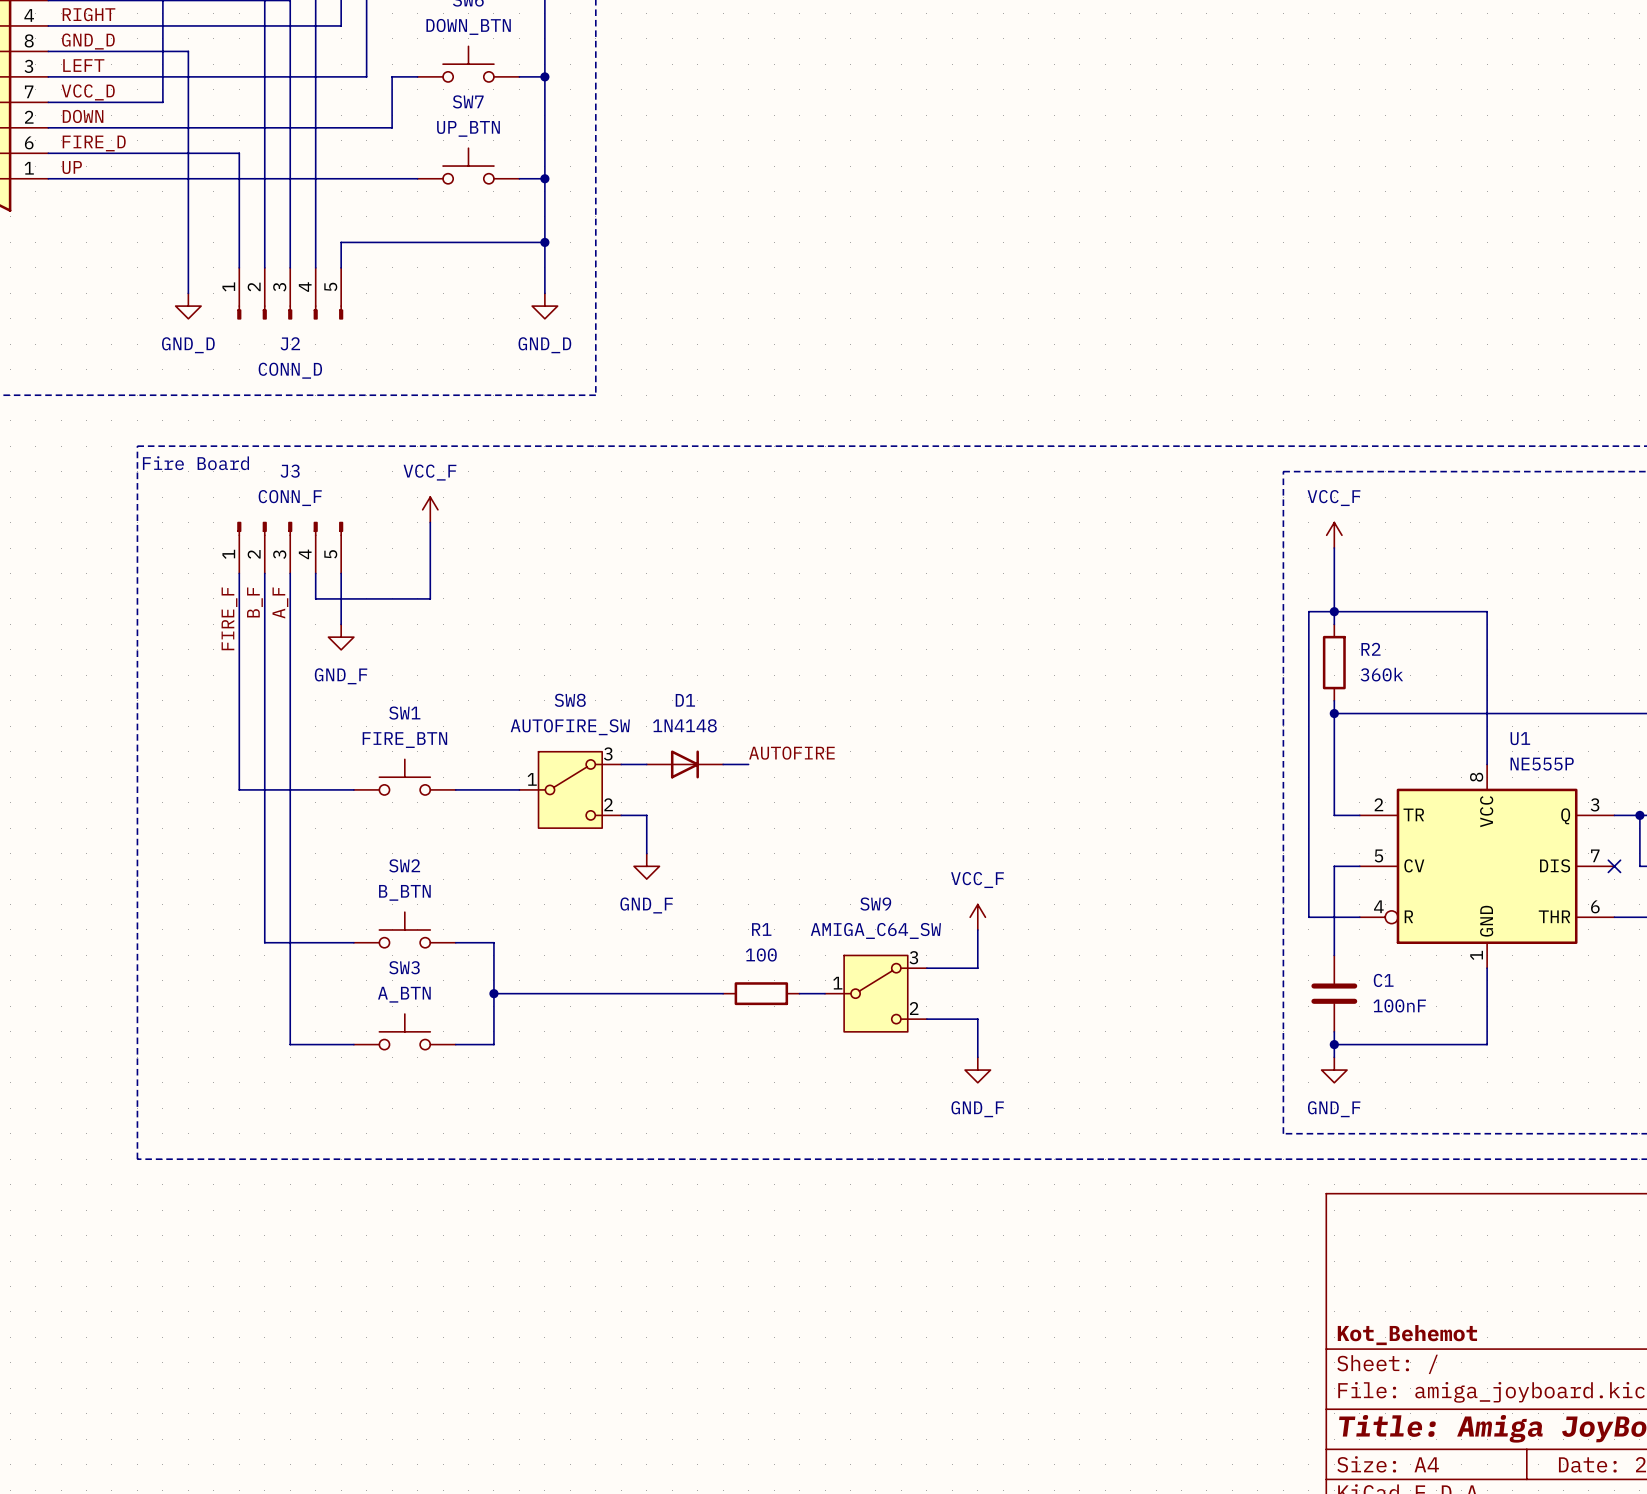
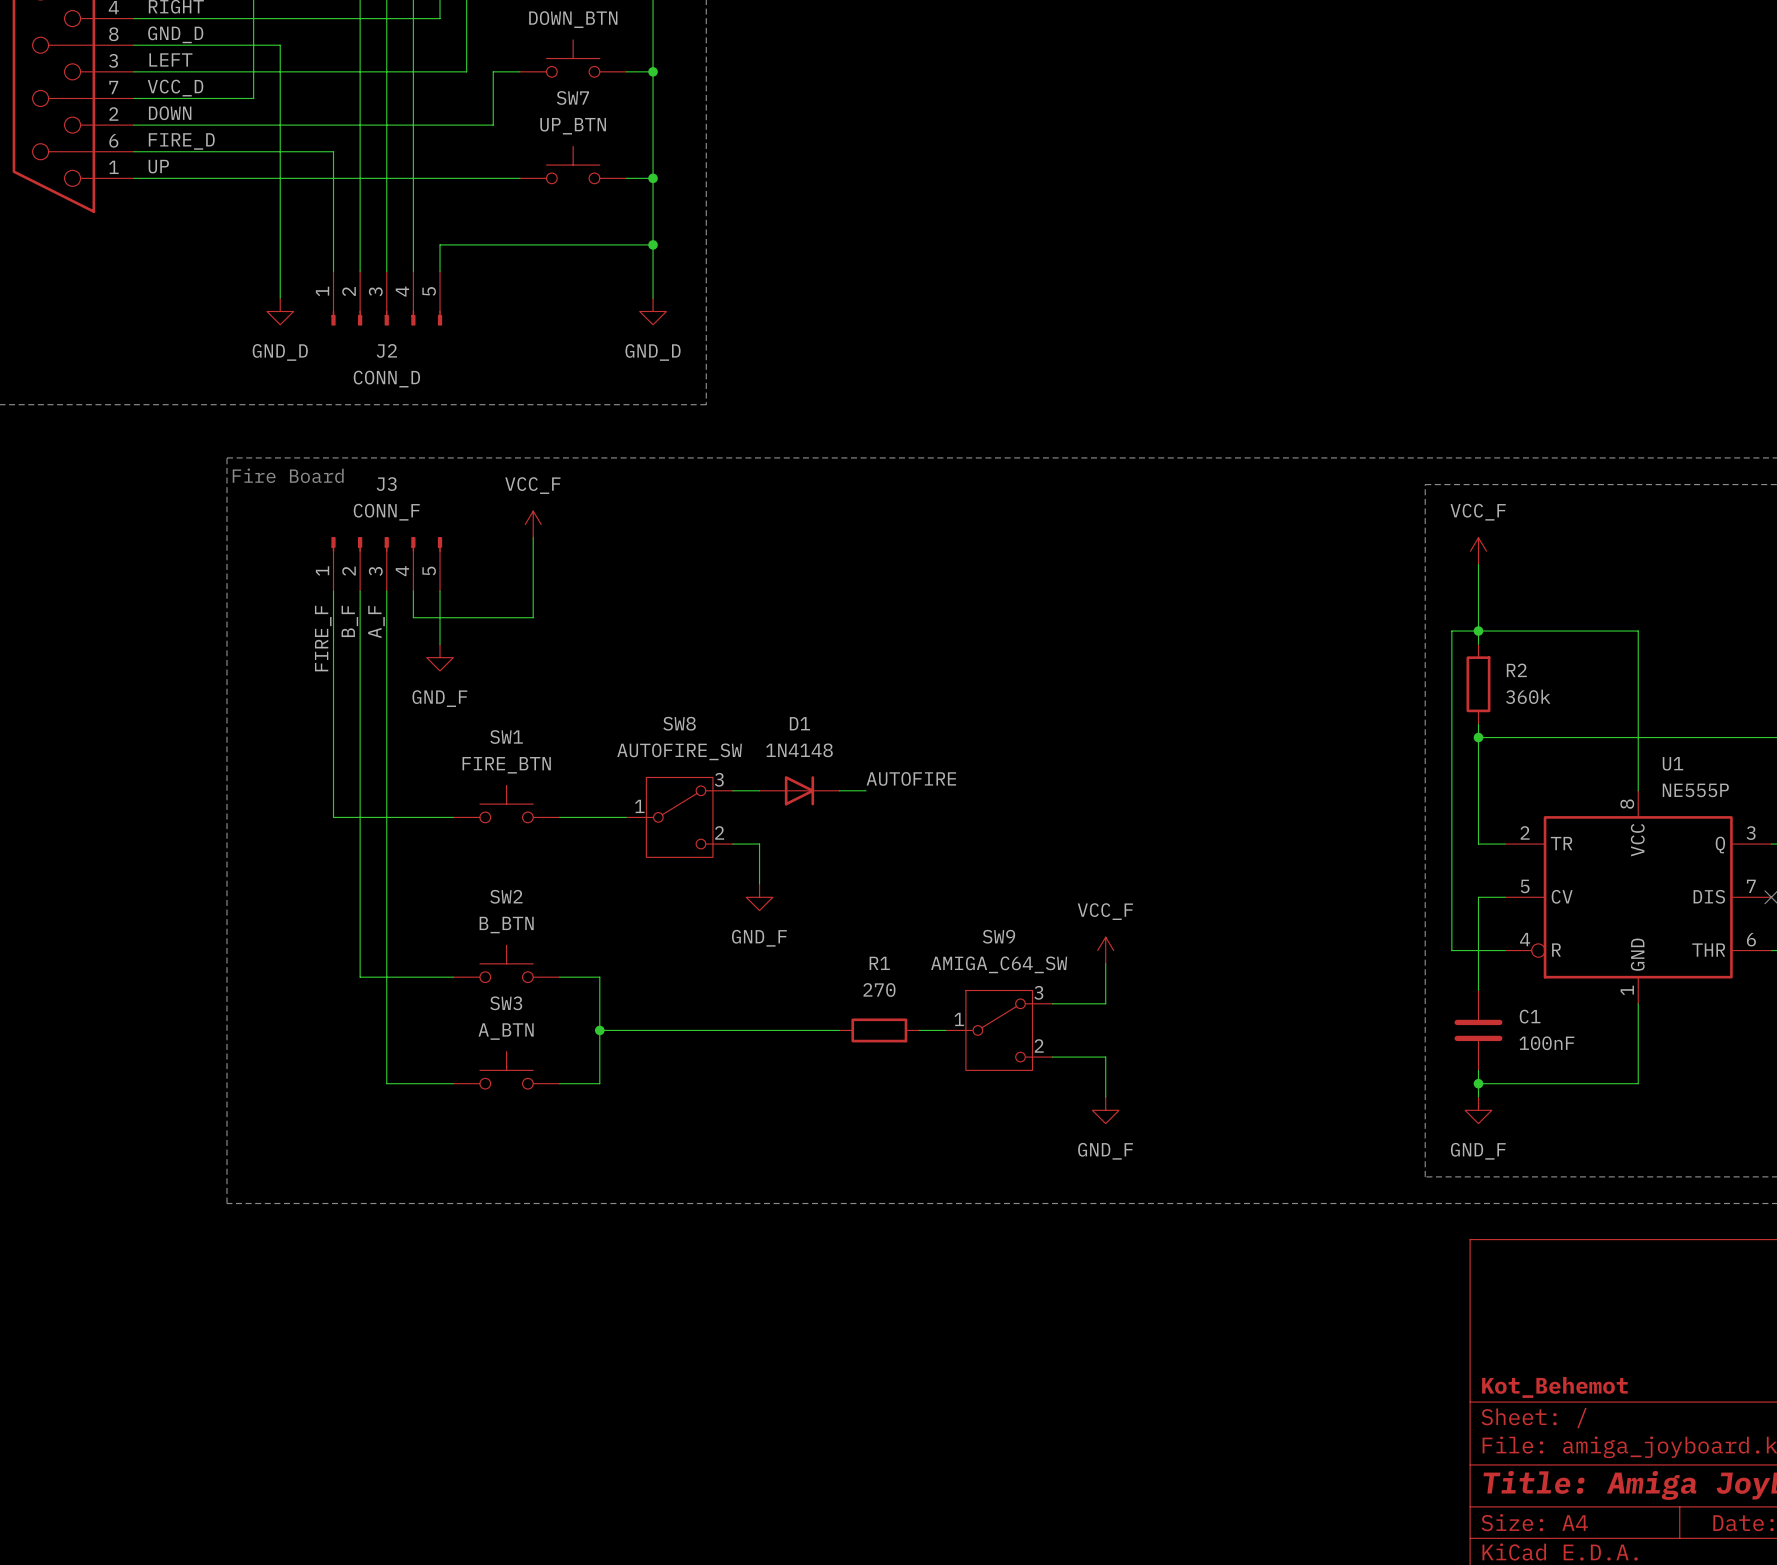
R1 value: 100 (761, 954) -> 270 (879, 990)

